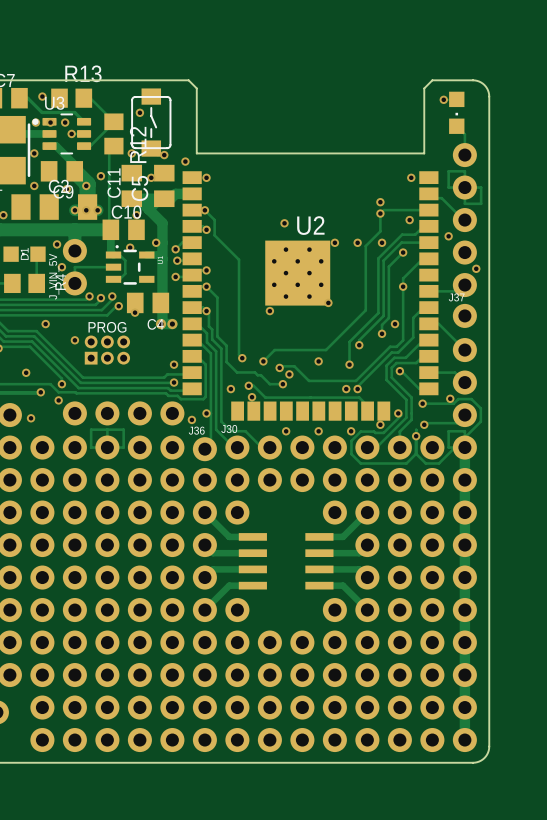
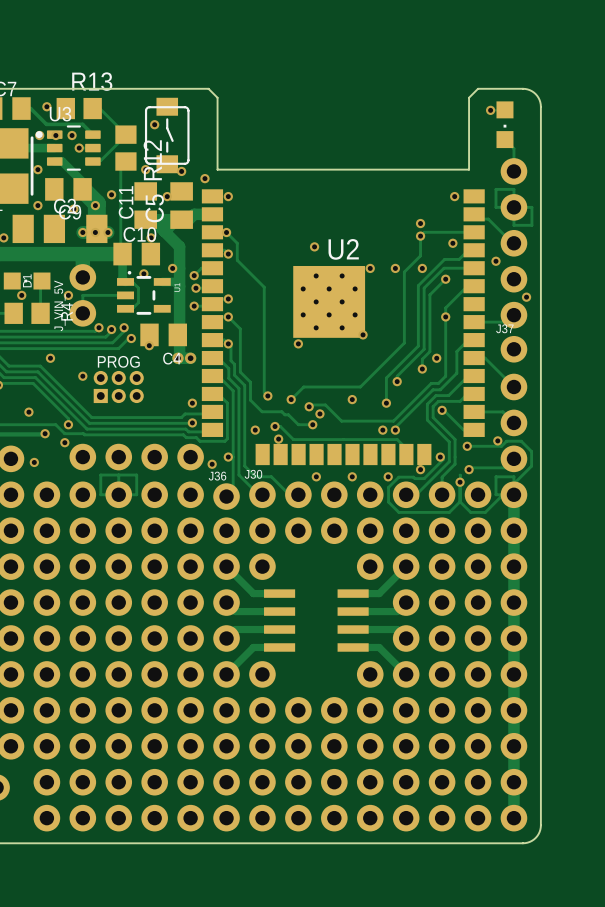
via: (57, 244) -> none
via: none -> (21, 295)

